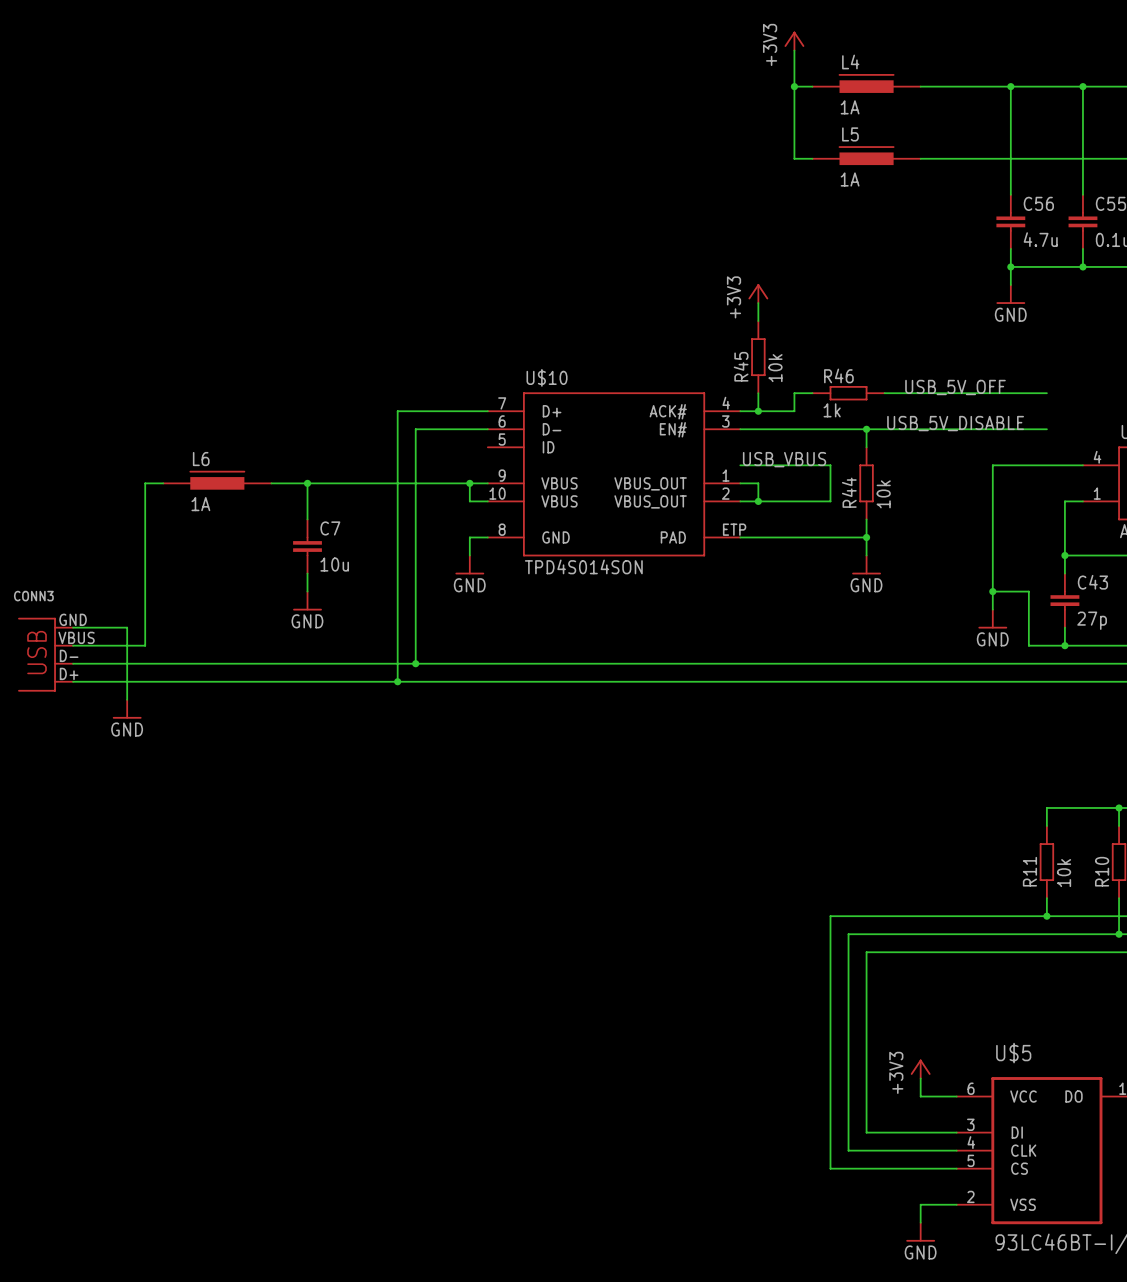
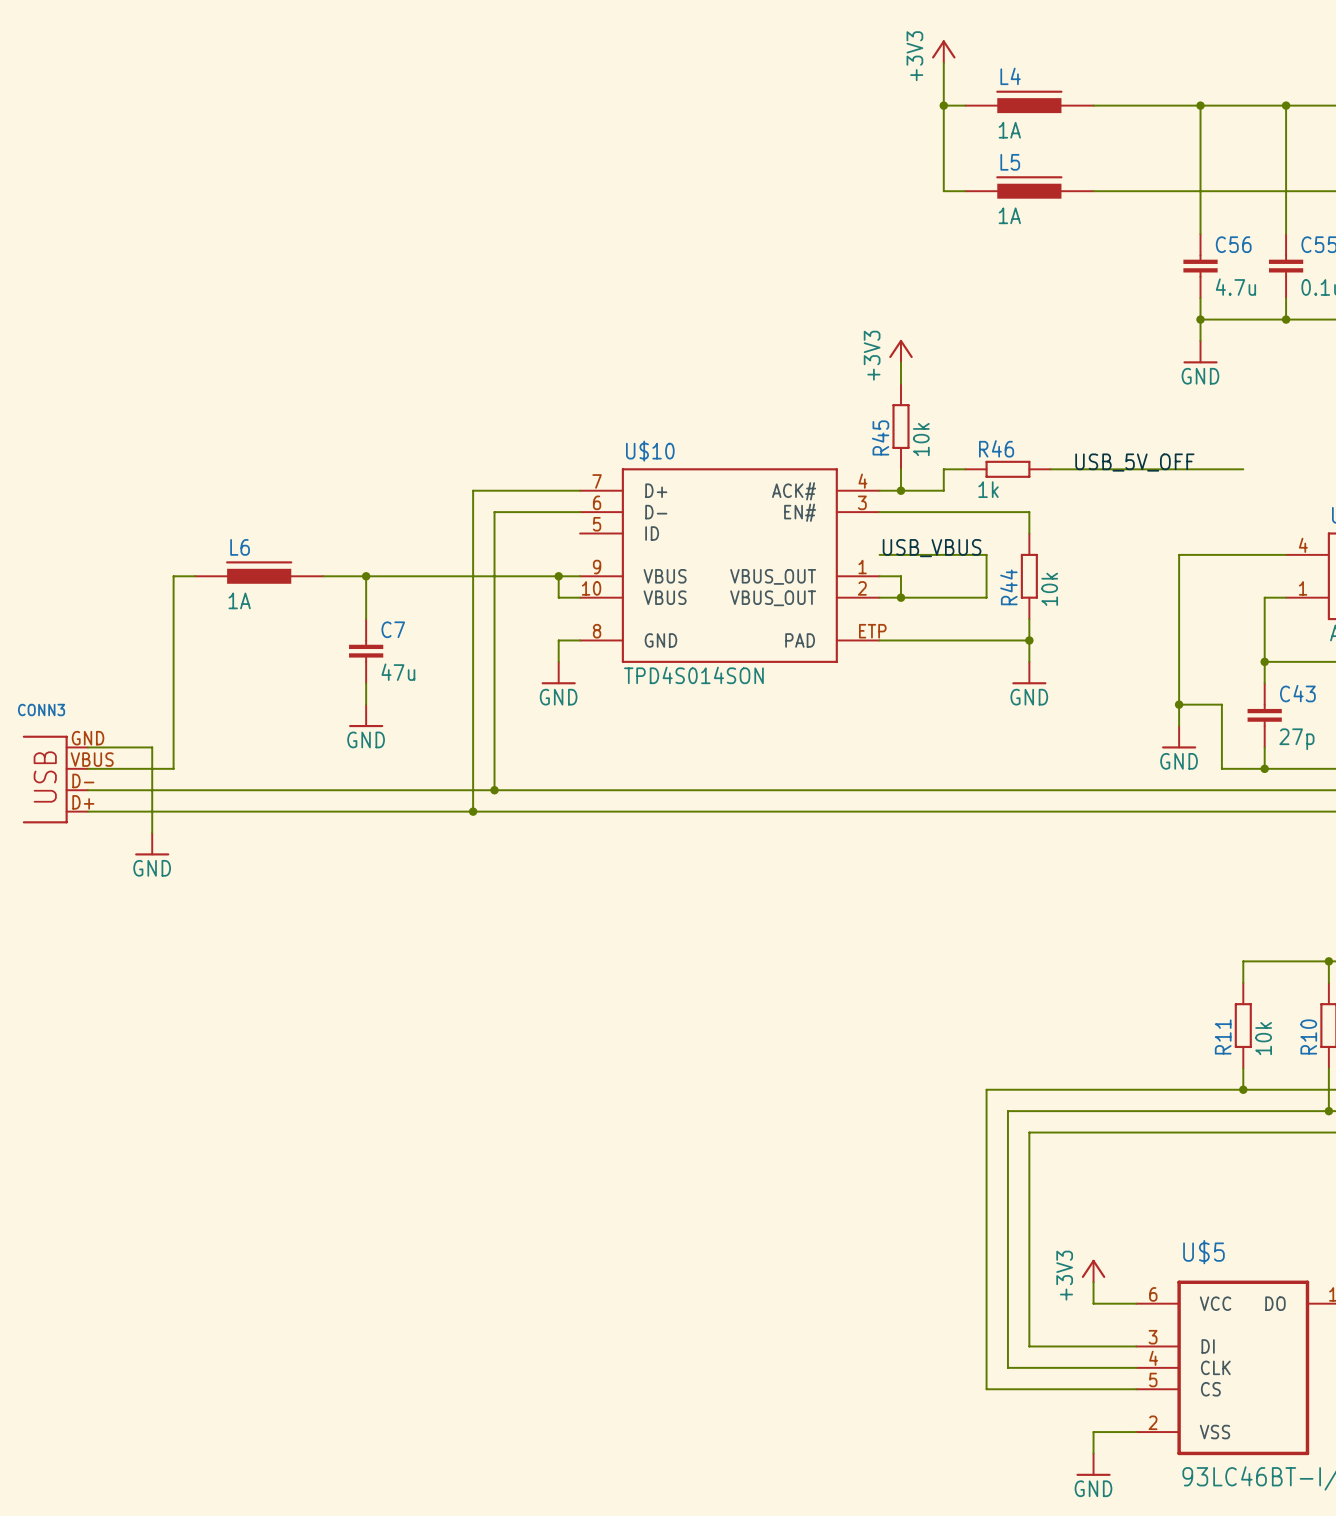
label: USB_5V_DISABLE (955, 423) -> none
wire: (866, 429) (1046, 429) -> none
junction: (866, 429) -> none
C7 value: 10u (334, 564) -> 47u (398, 672)

